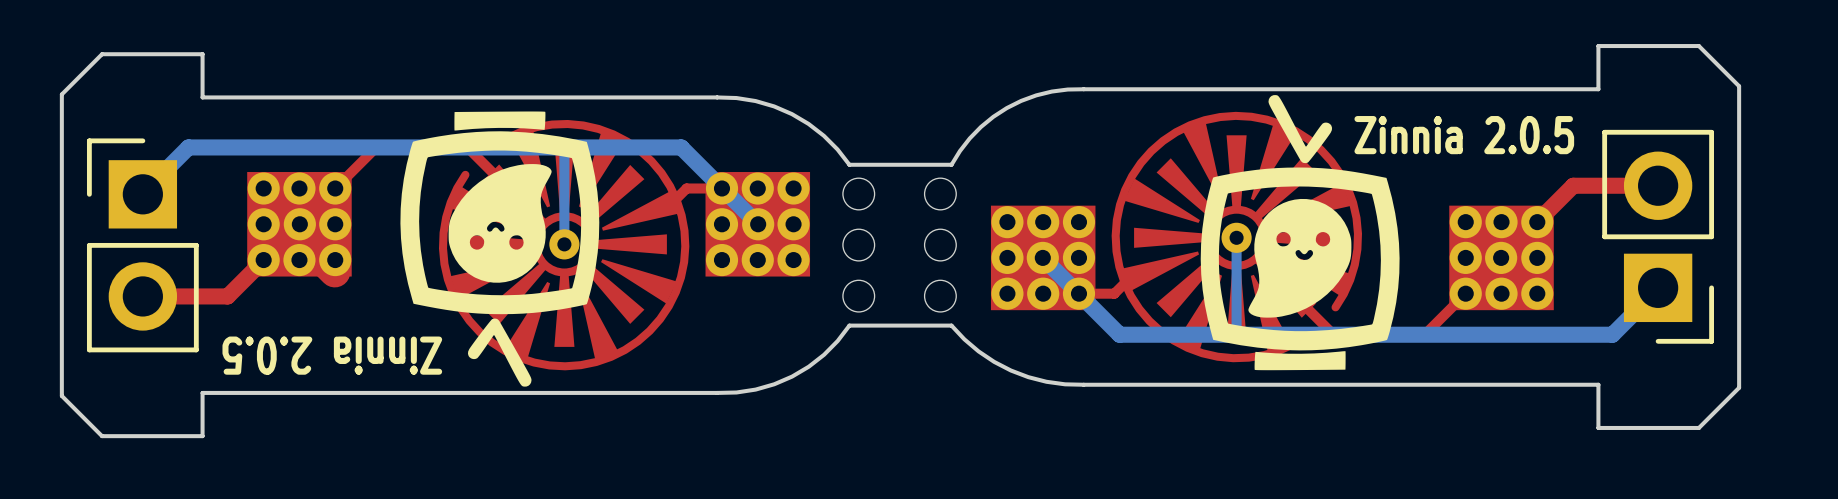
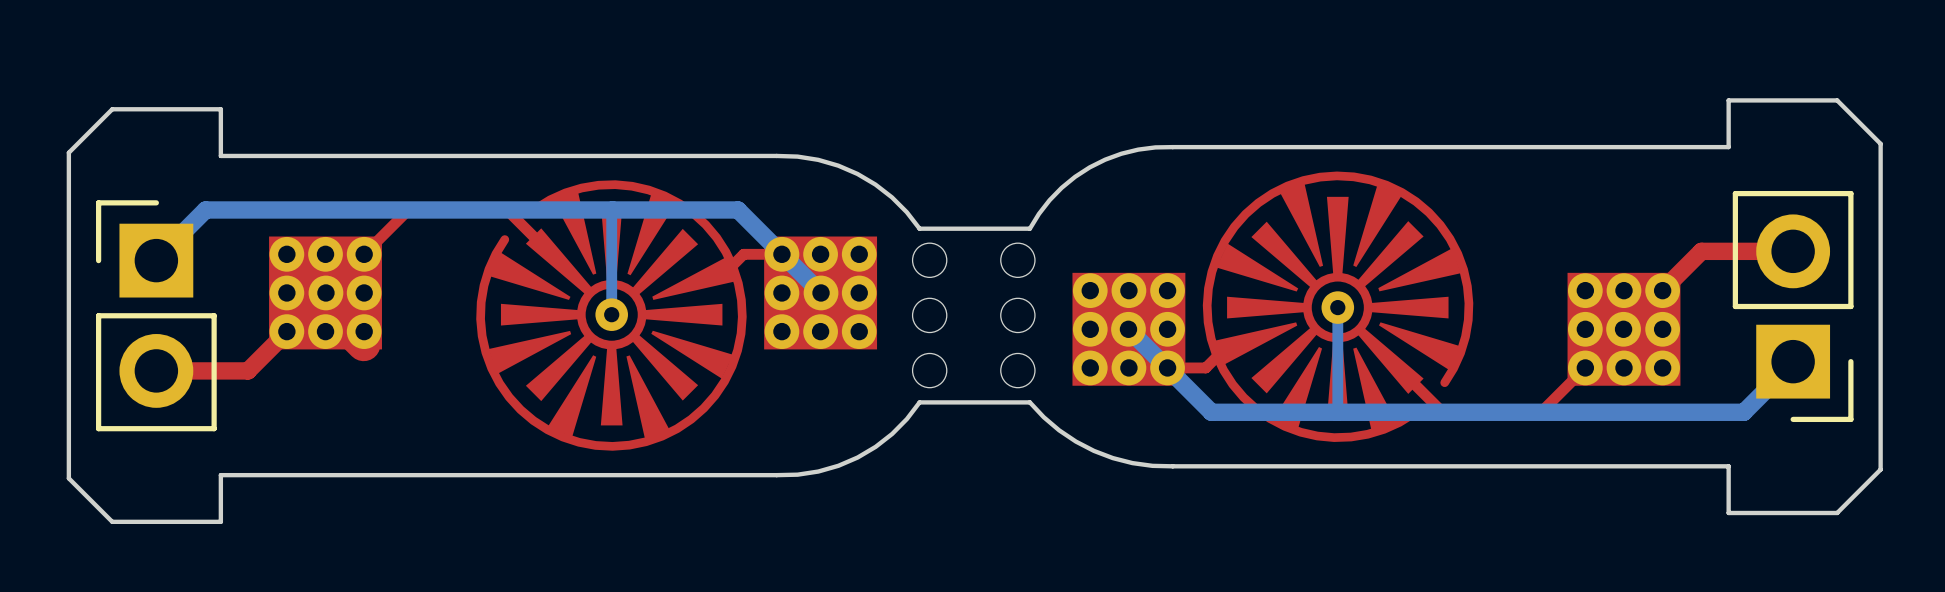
drawing: [1200, 95, 1400, 371] -> none
drawing: [400, 111, 600, 387] -> none
text: Zinnia 2.0.5 (1464, 135) -> none
text: Zinnia 2.0.5 (332, 355) -> none

